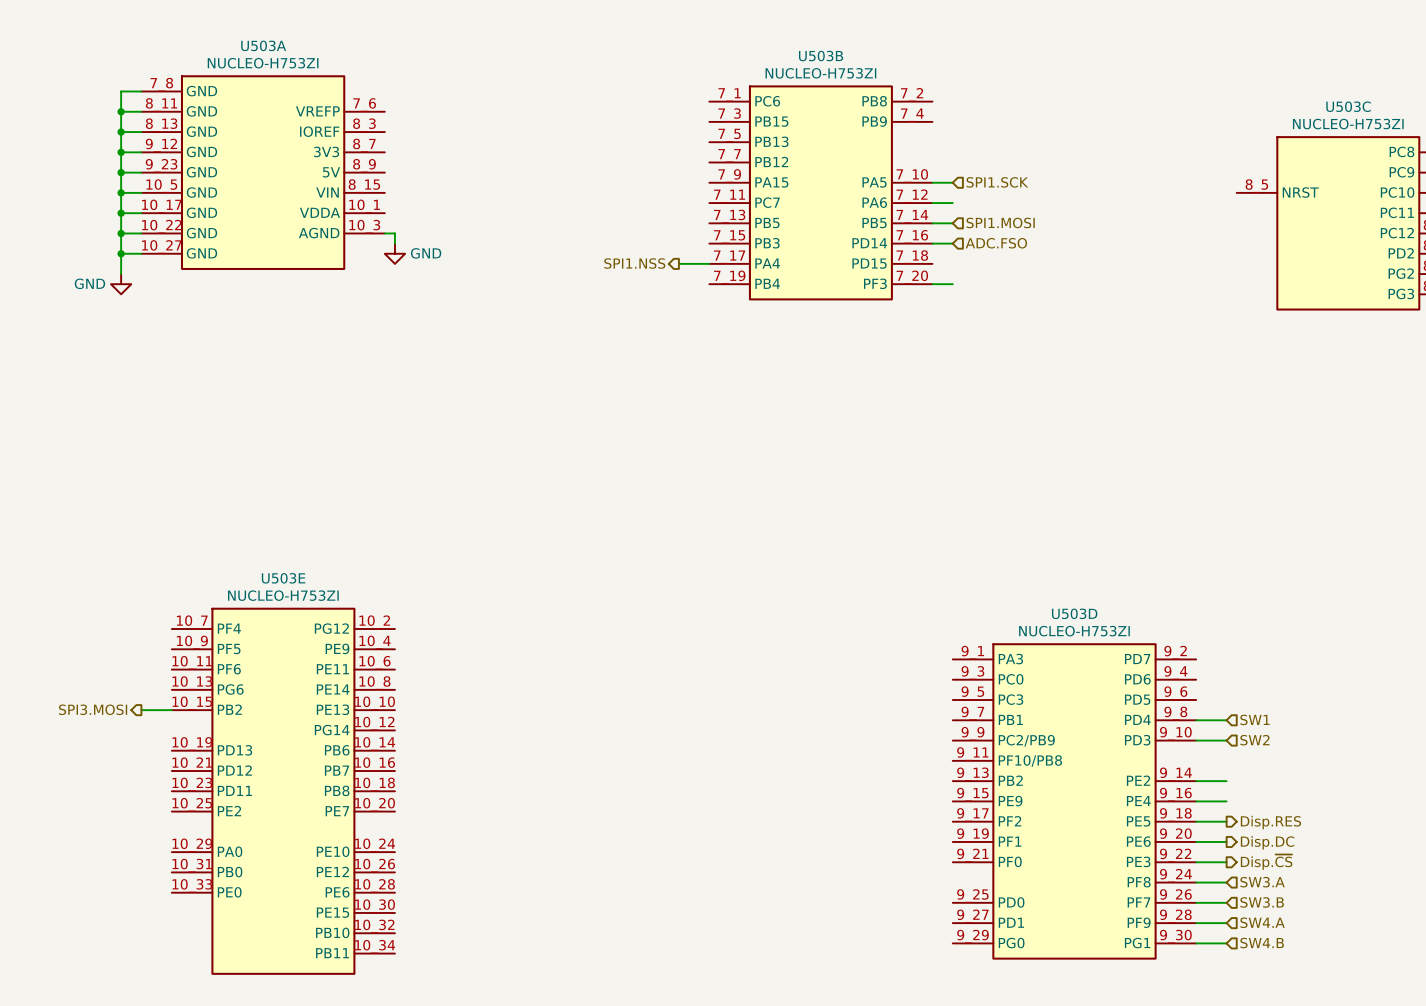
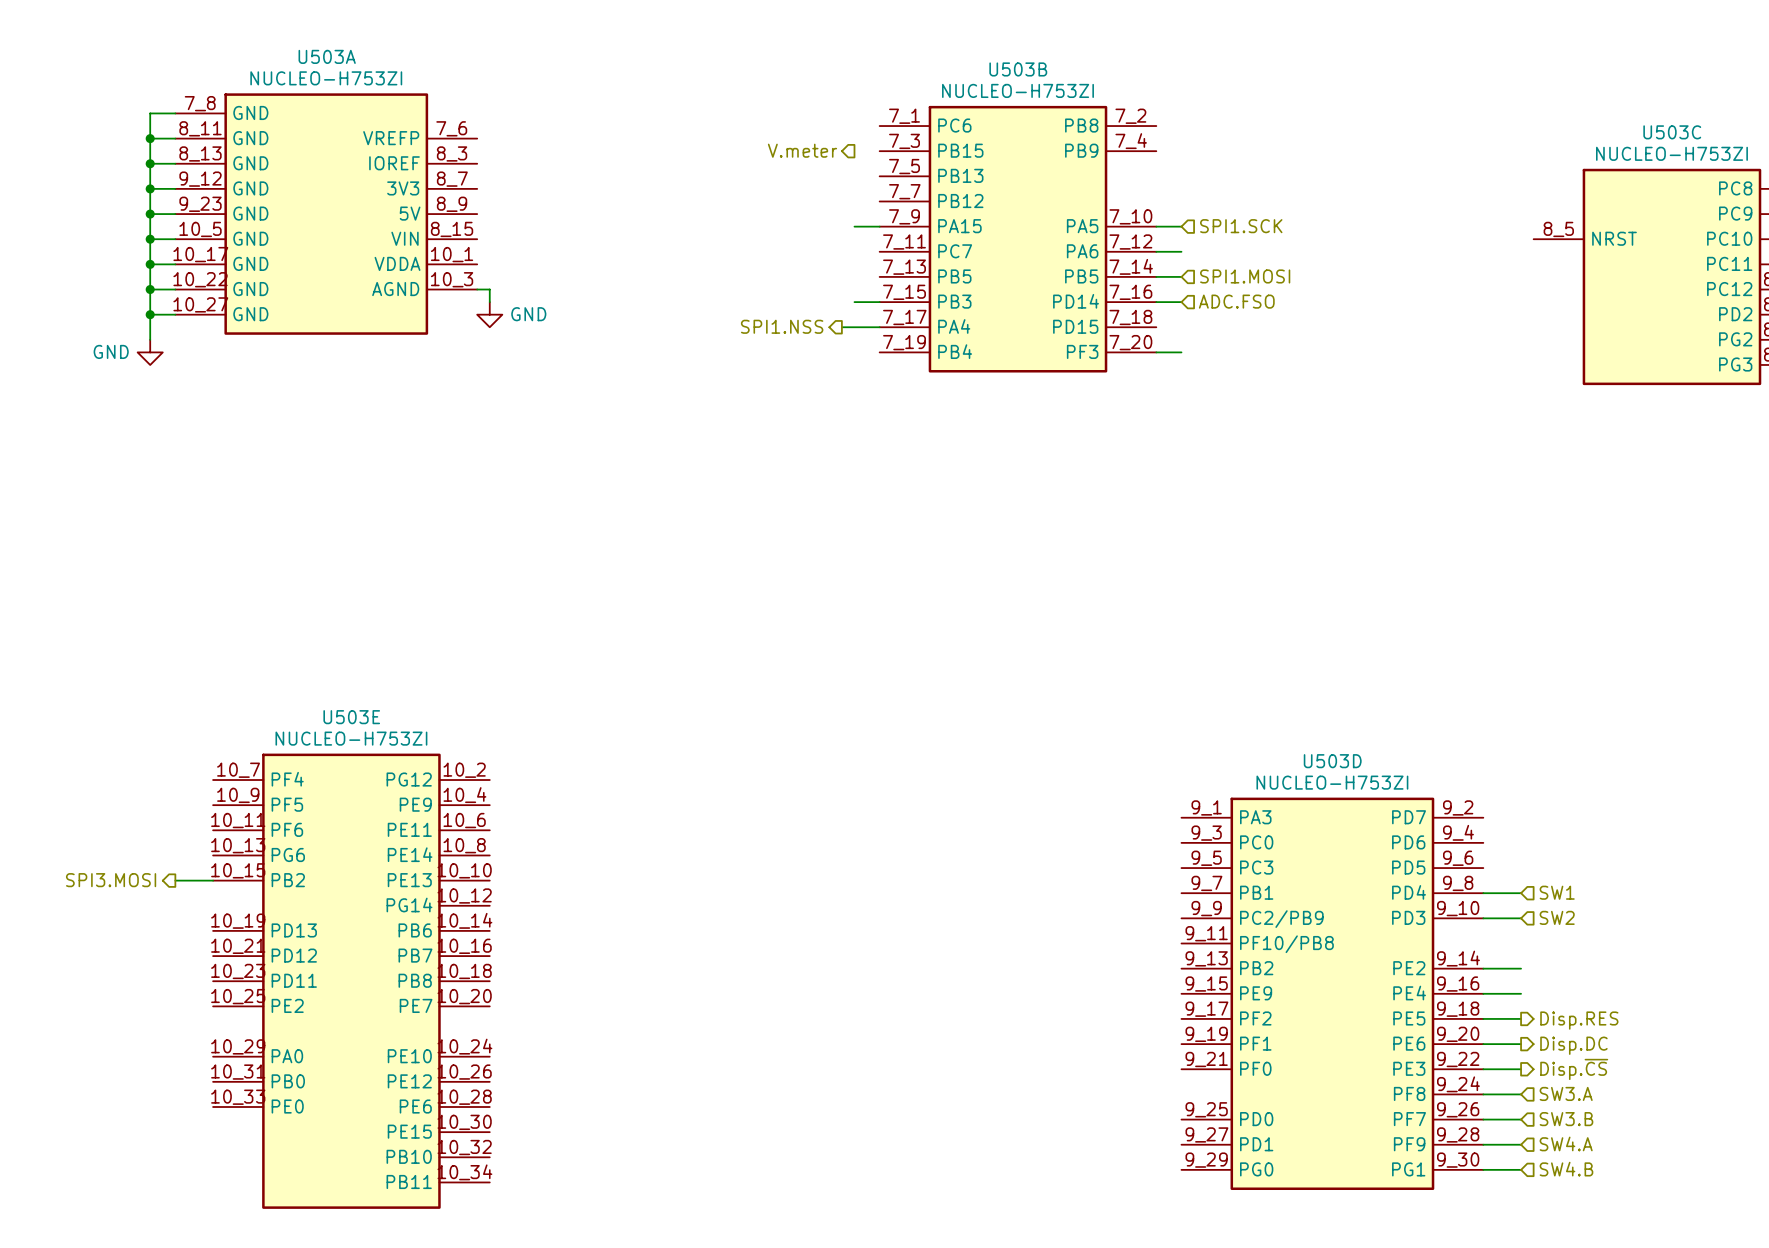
hierarchical label: none -> V.meter (802, 150)
wire: none -> (854, 226) (879, 226)
wire: none -> (854, 302) (879, 302)

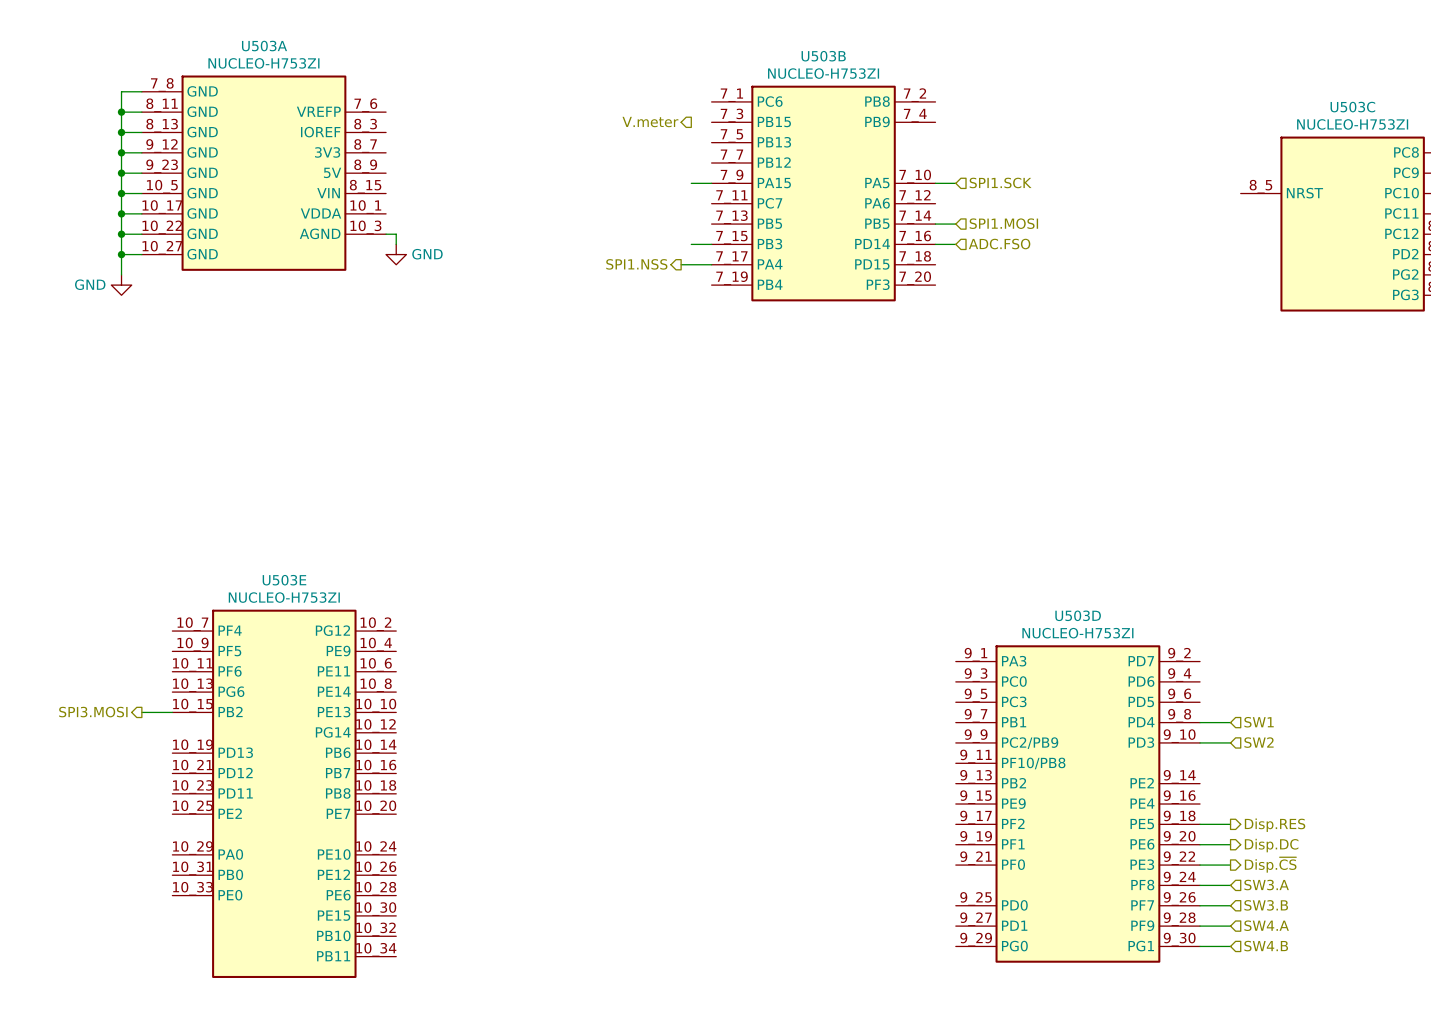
wire: (1156, 251) (1181, 251) -> none
wire: (1156, 352) (1181, 352) -> none
wire: (1483, 968) (1521, 968) -> none
wire: (1483, 993) (1521, 993) -> none

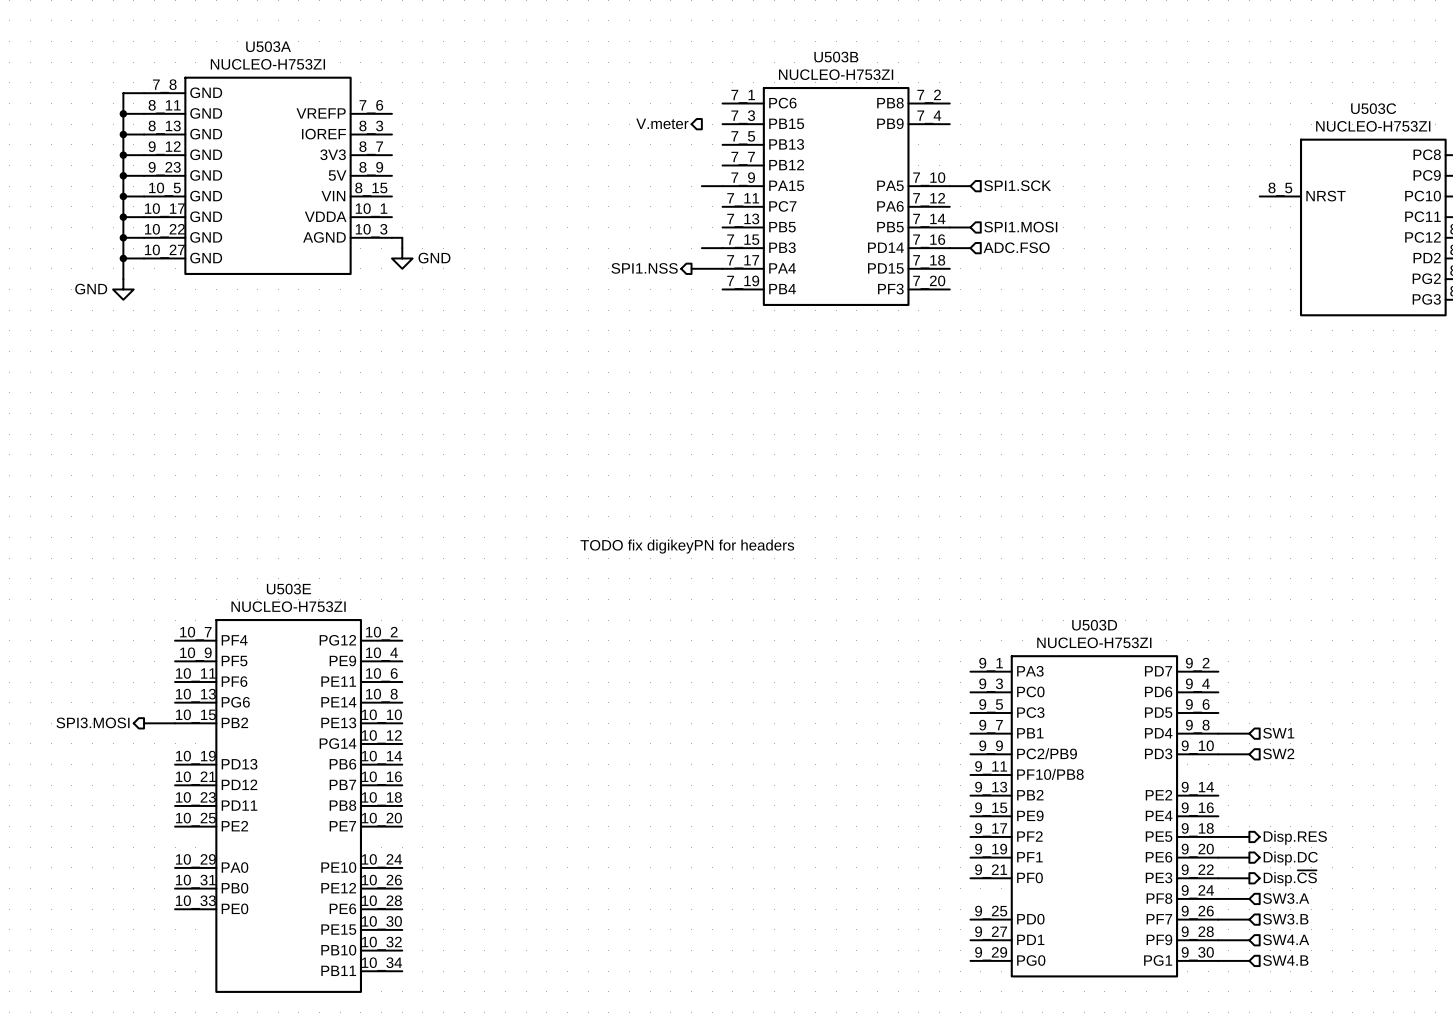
text: none -> TODO fix digikeyPN for headers (687, 546)

